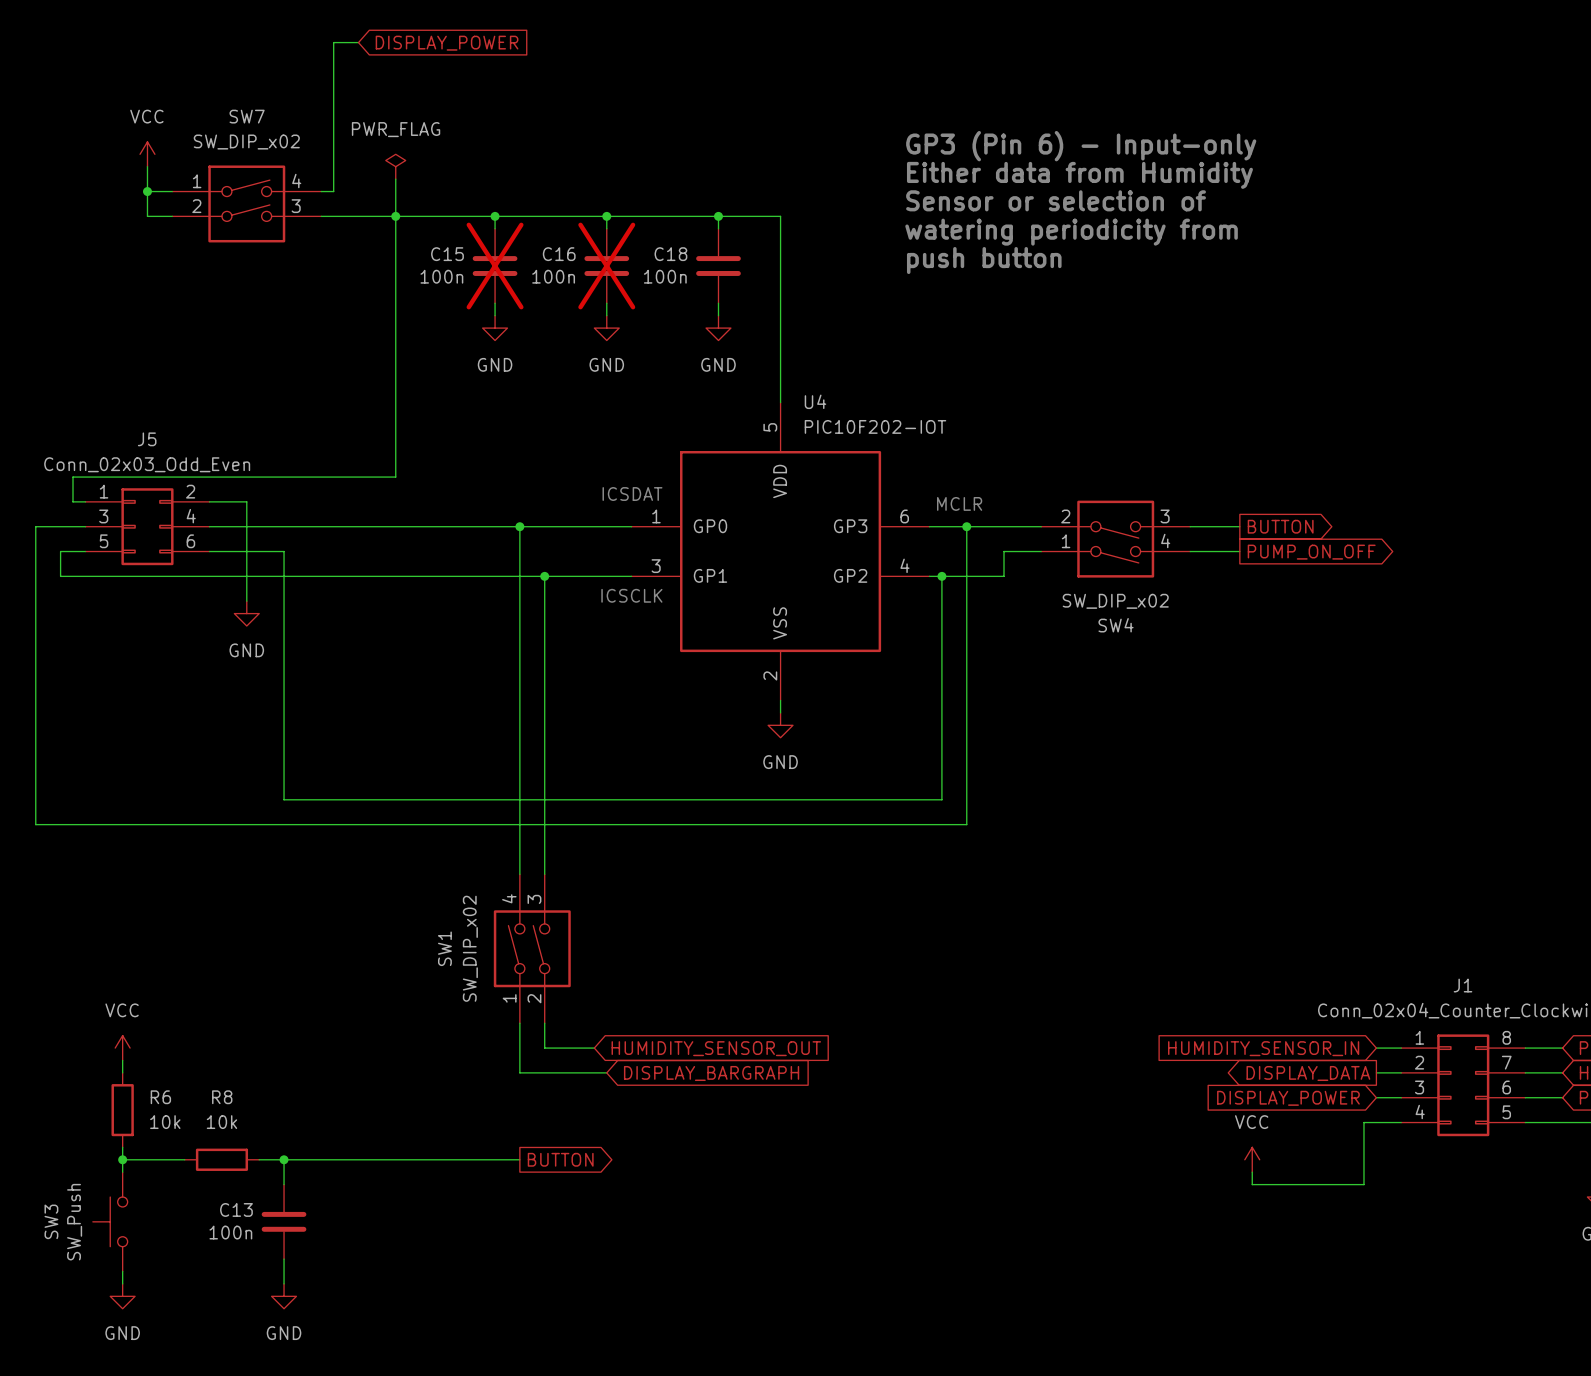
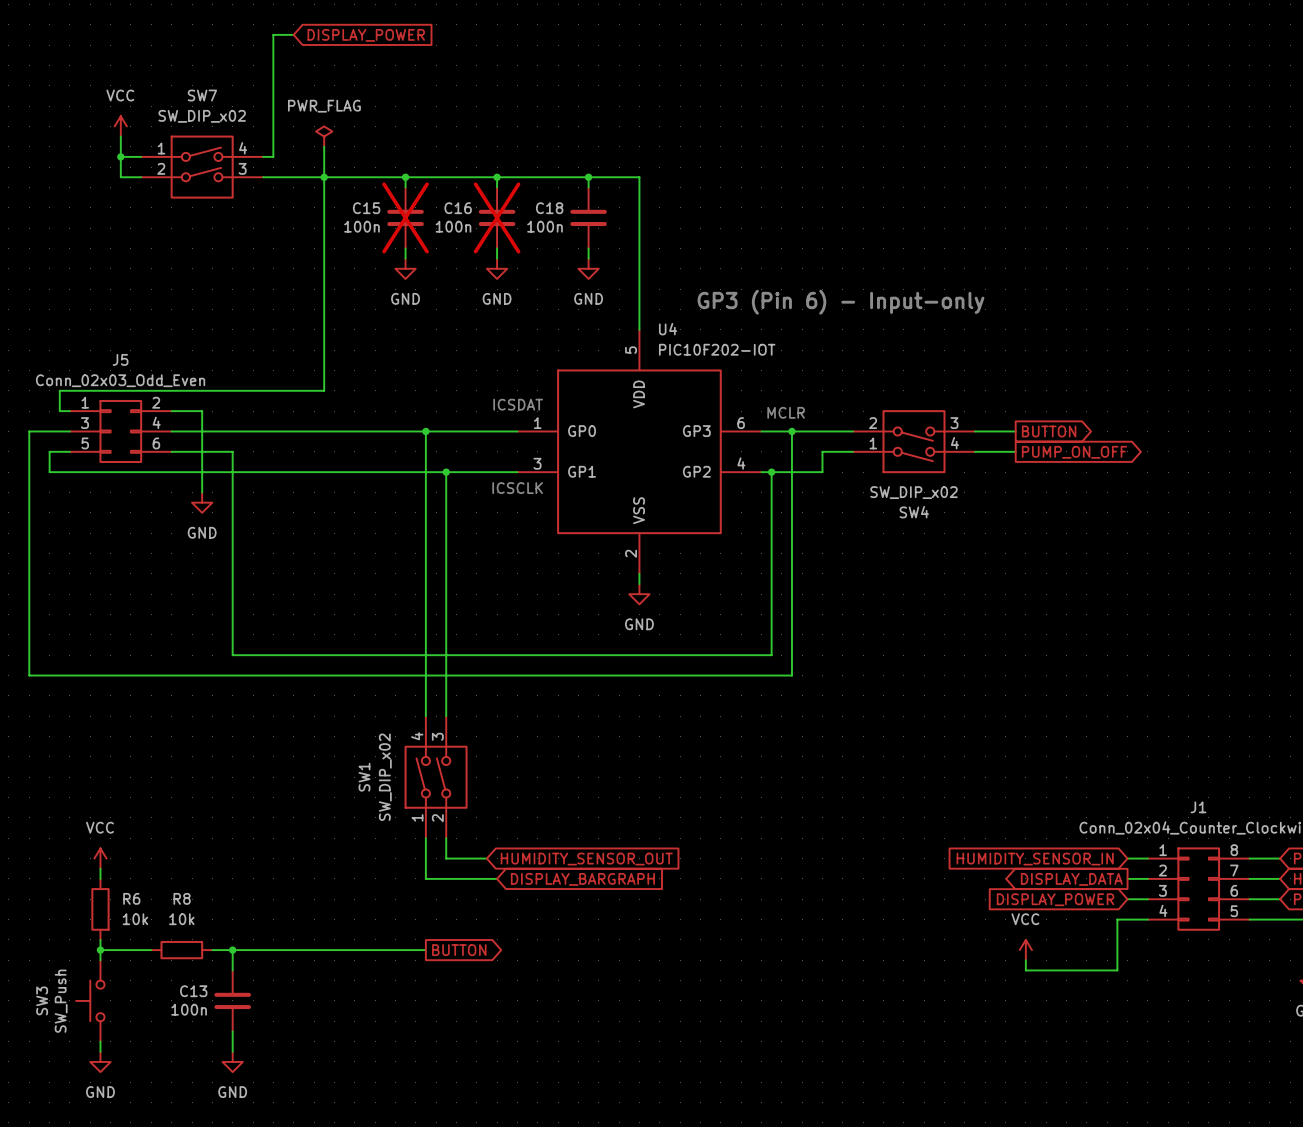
text position: GP3 (Pin 6) - Input-only (1081, 146) -> GP3 (Pin 6) - Input-only (840, 302)
text: Either data from Humidity (1079, 175) -> none
text: Sensor or selection of (1056, 200) -> none
text: watering periodicity from (1071, 232) -> none
text: push button (984, 260) -> none

